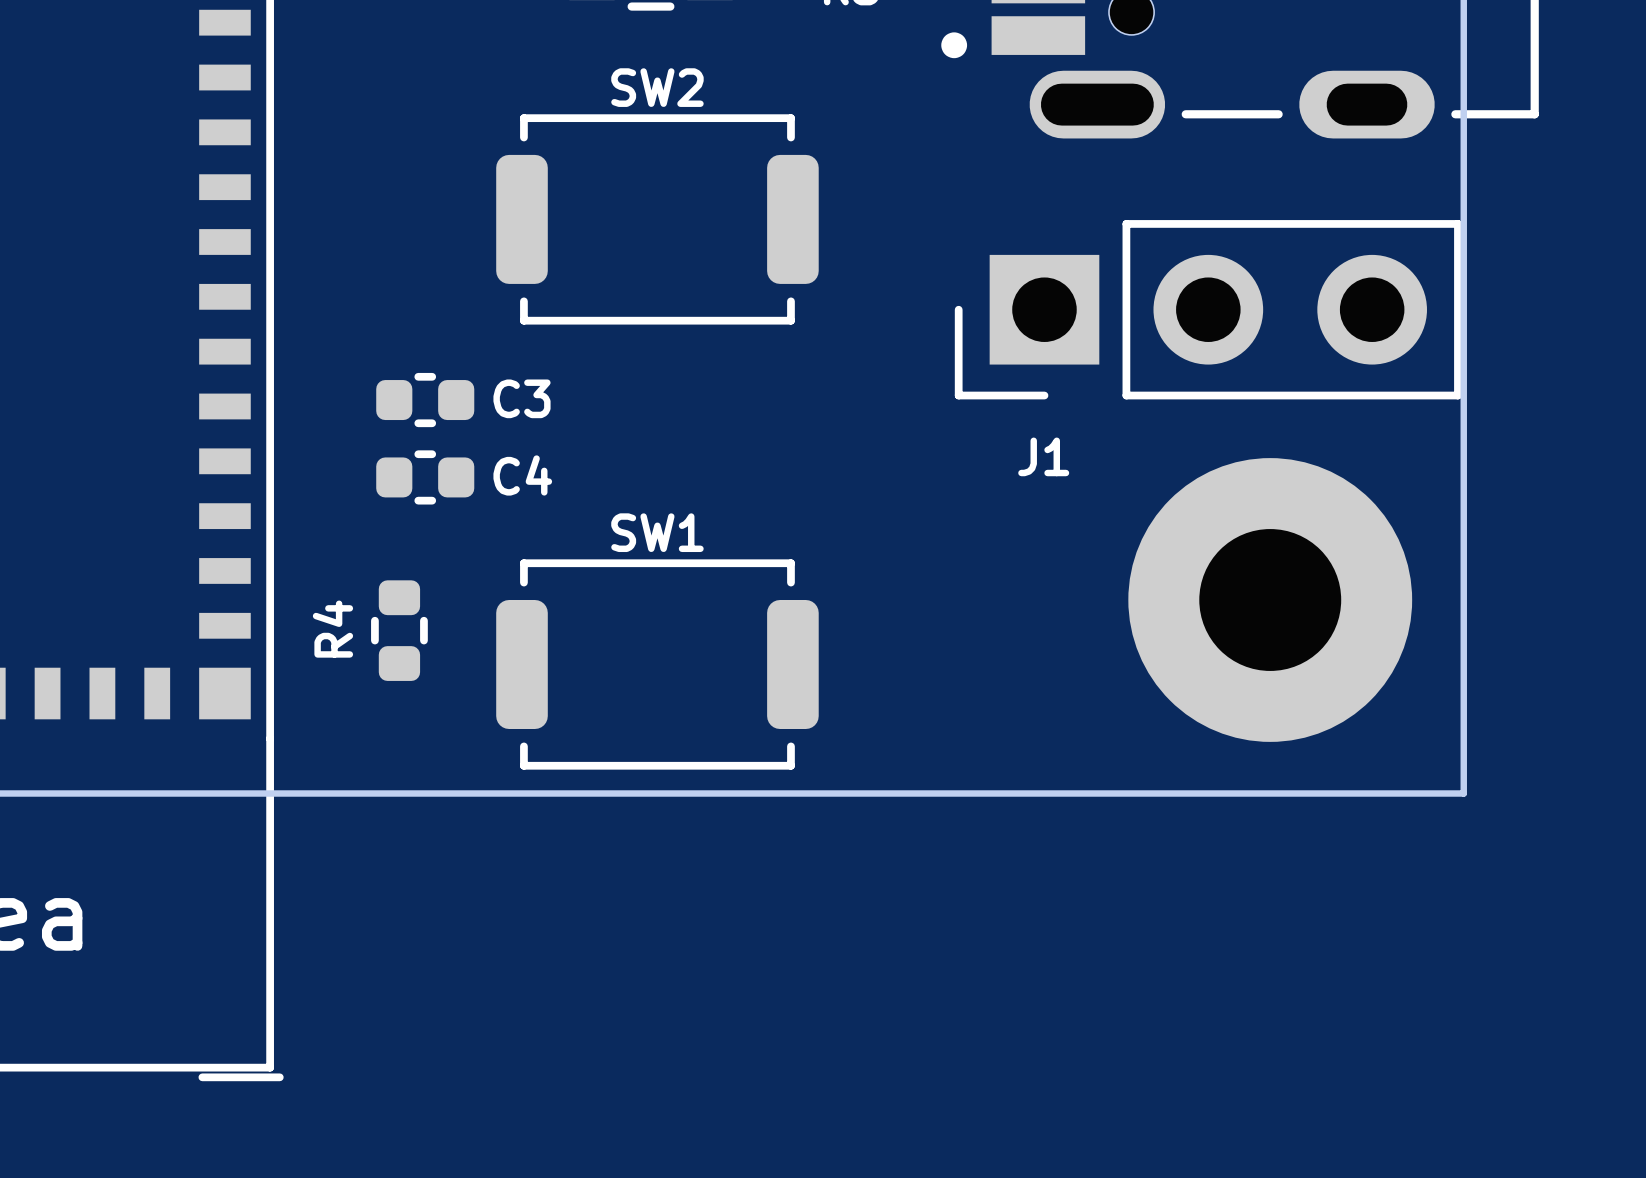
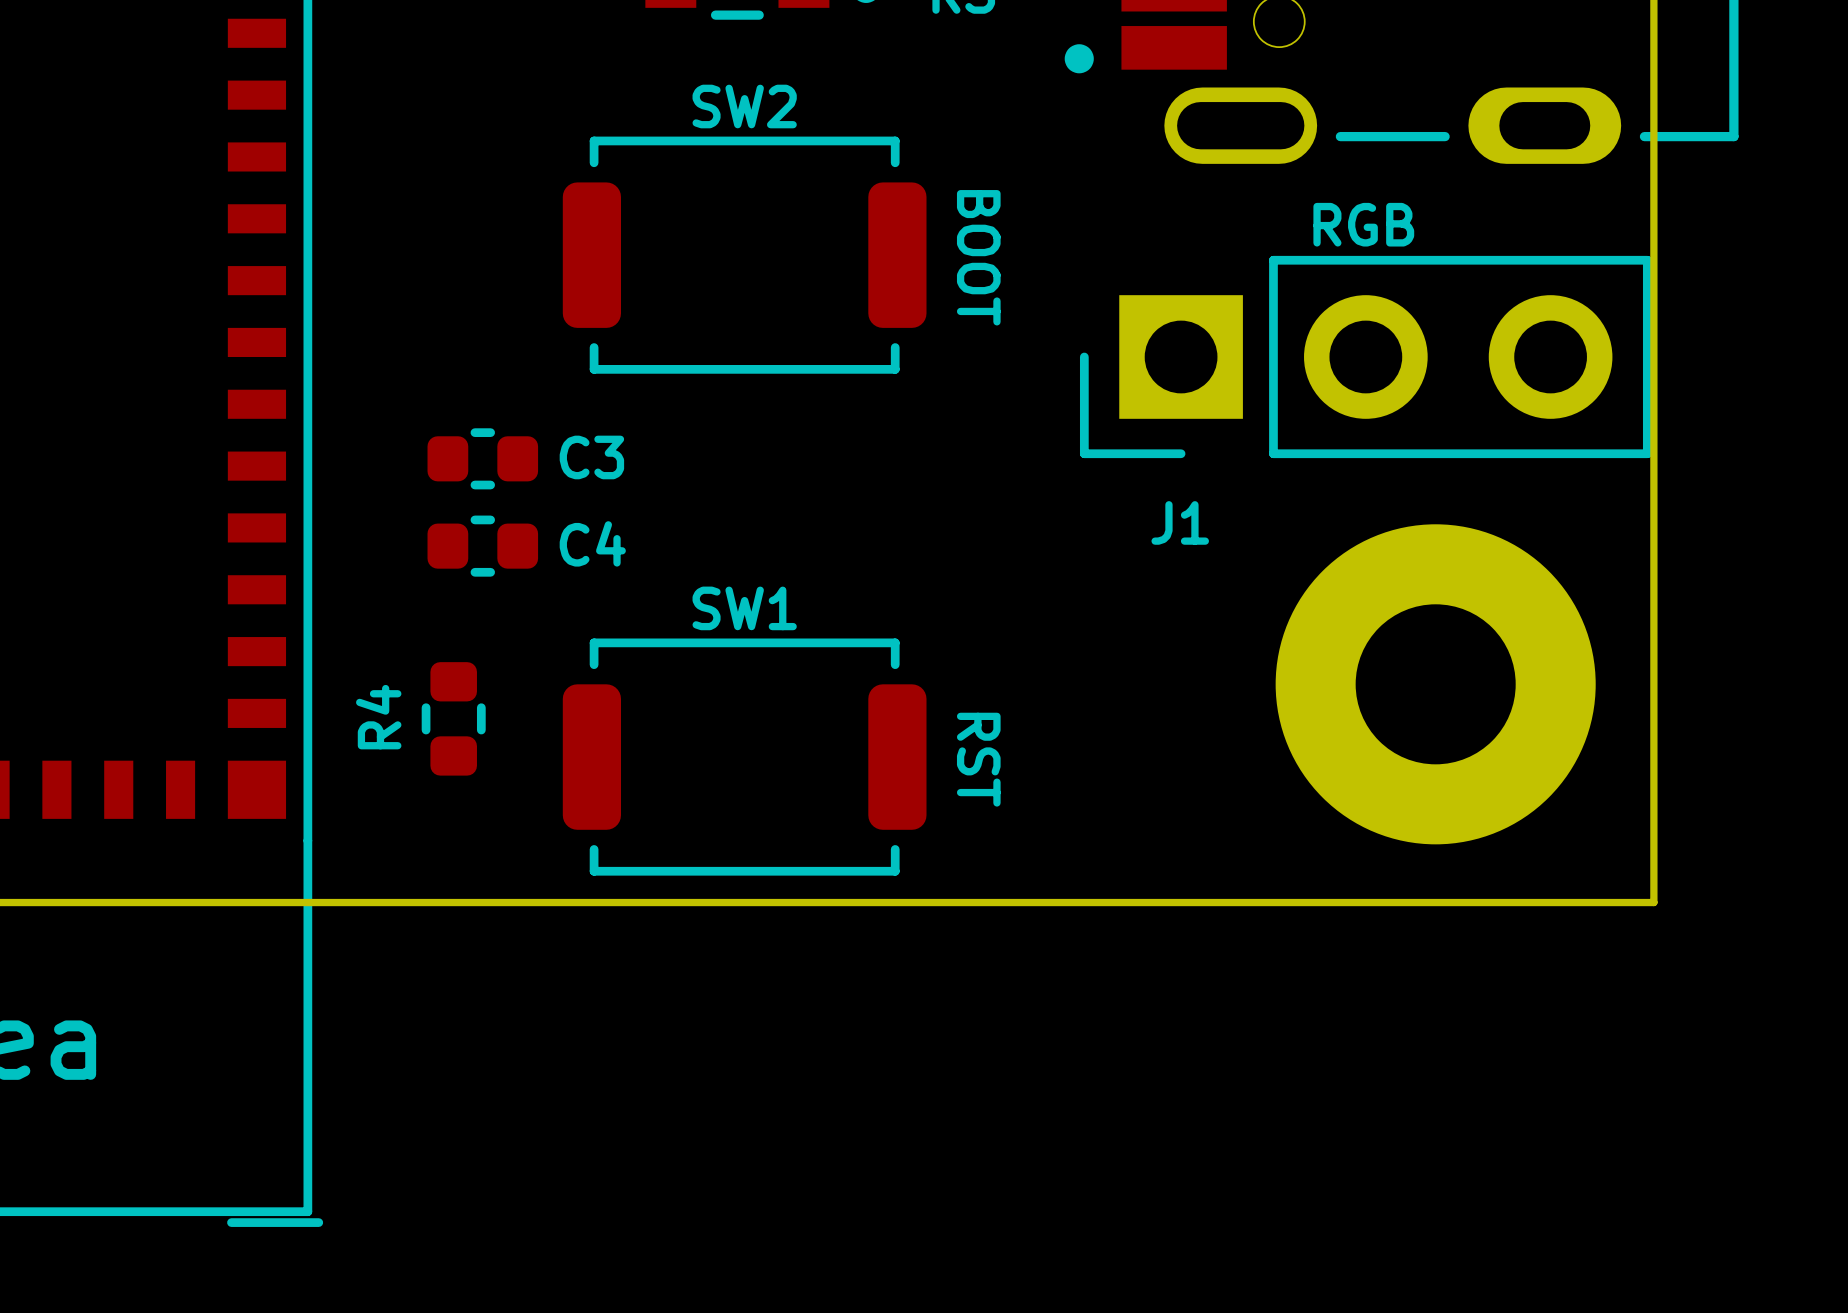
text: none -> RGB (1363, 224)
text: none -> BOOT (978, 257)
text: none -> RST (978, 759)

